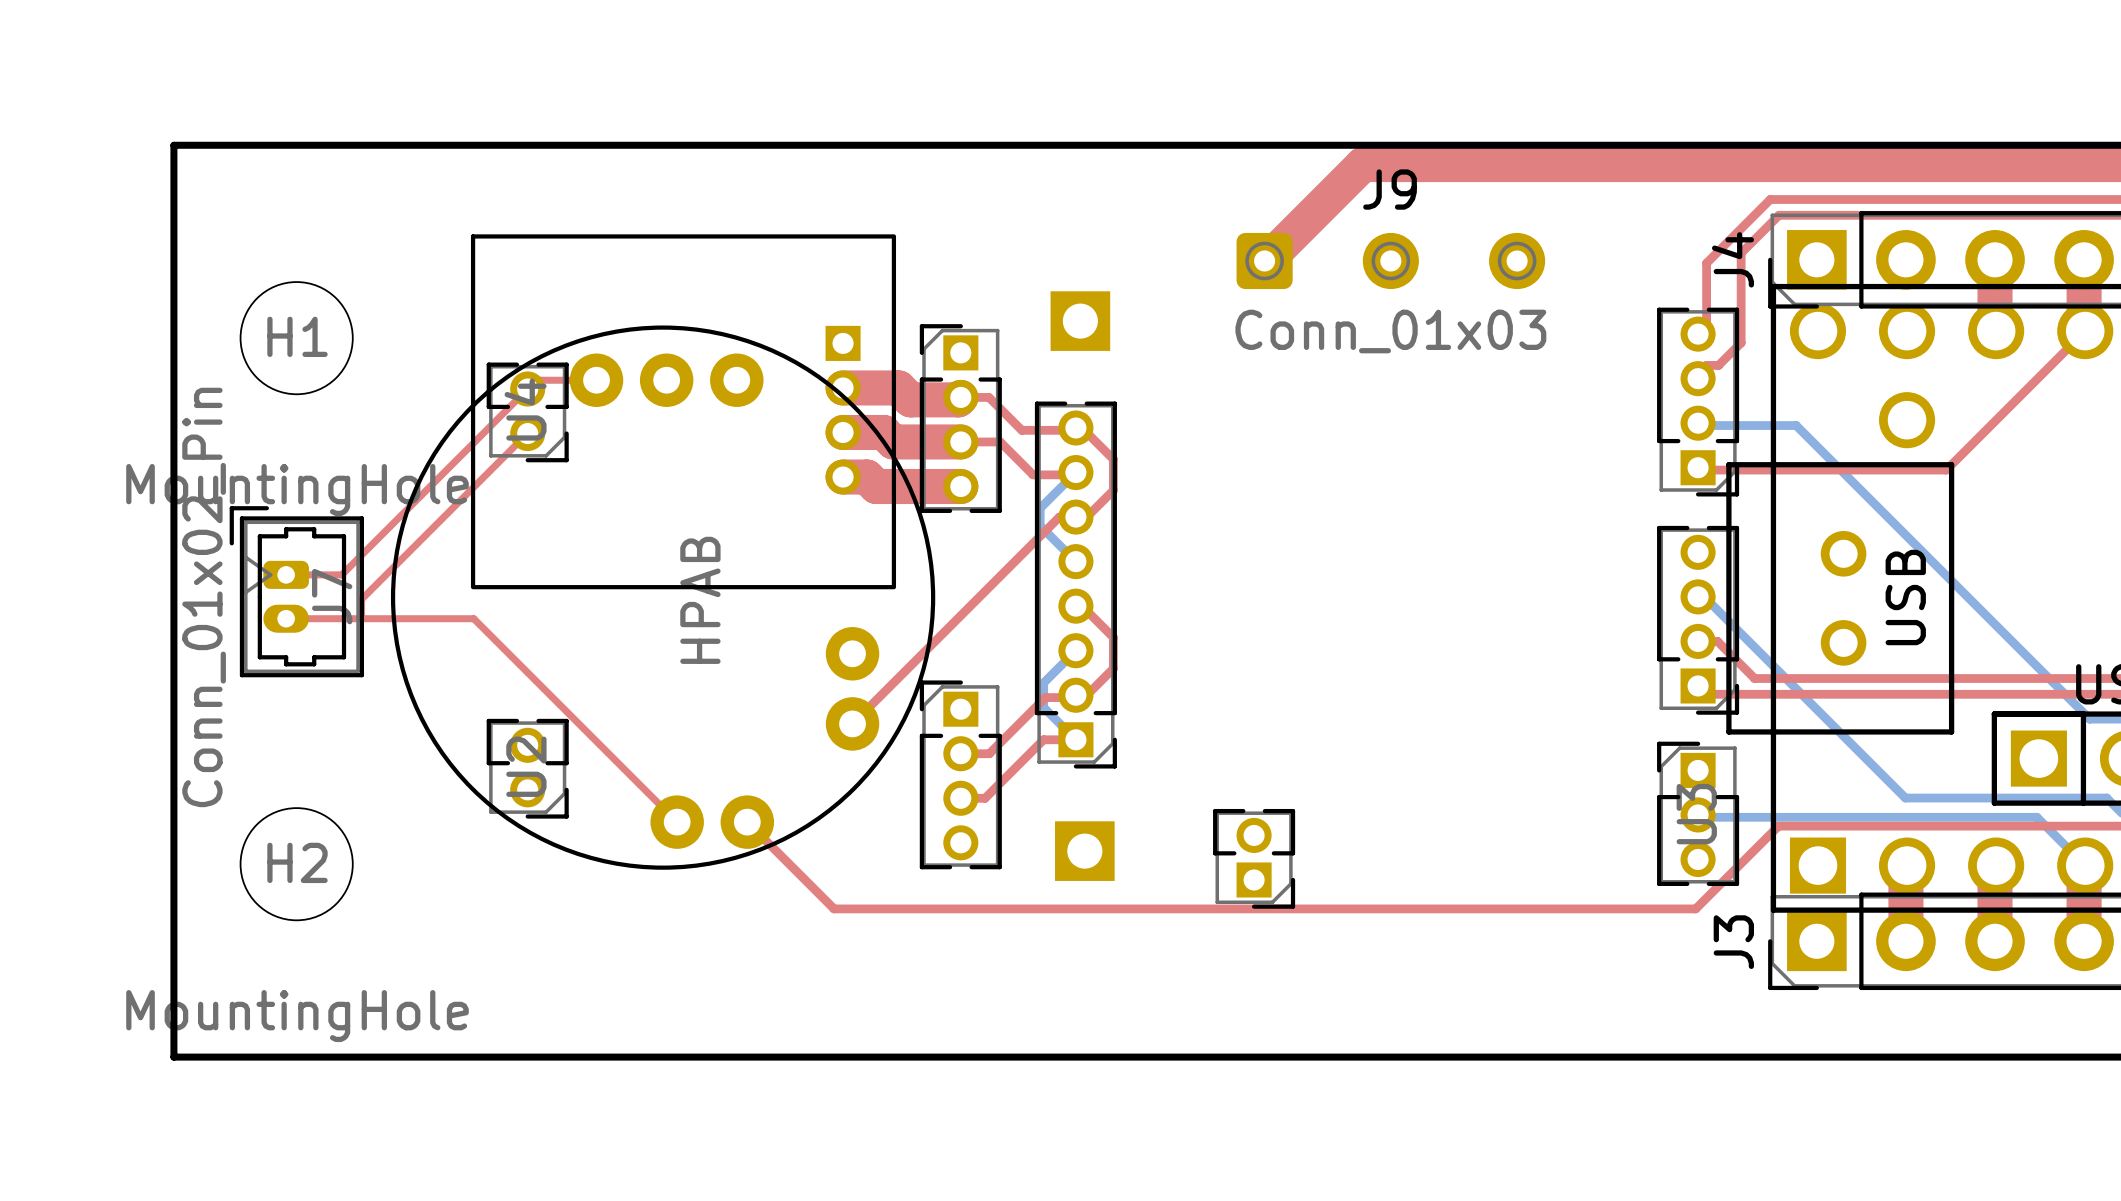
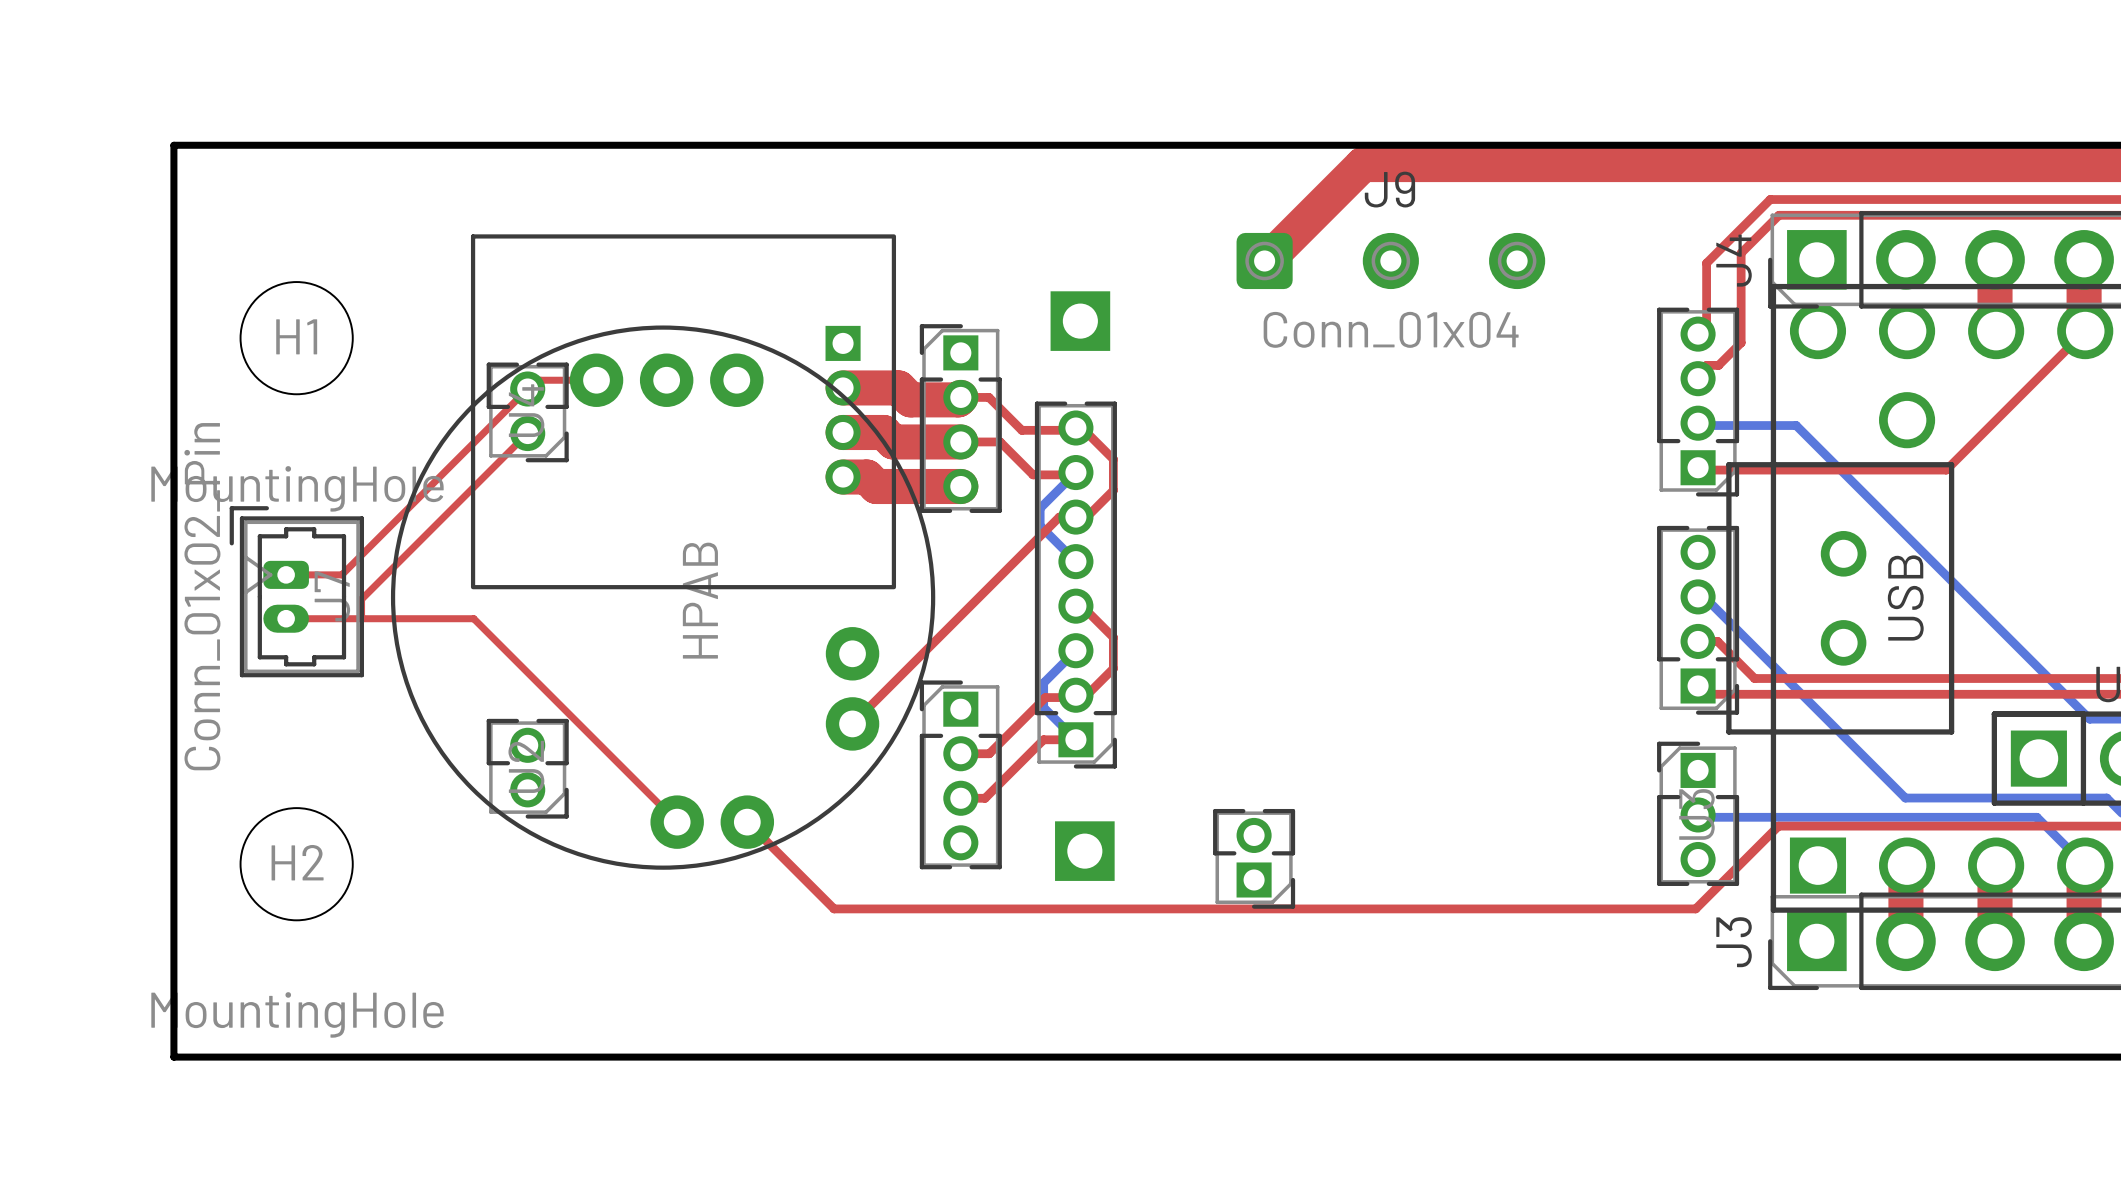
J9 value: Conn_01x03 (1390, 331) -> Conn_01x04 (1391, 329)

